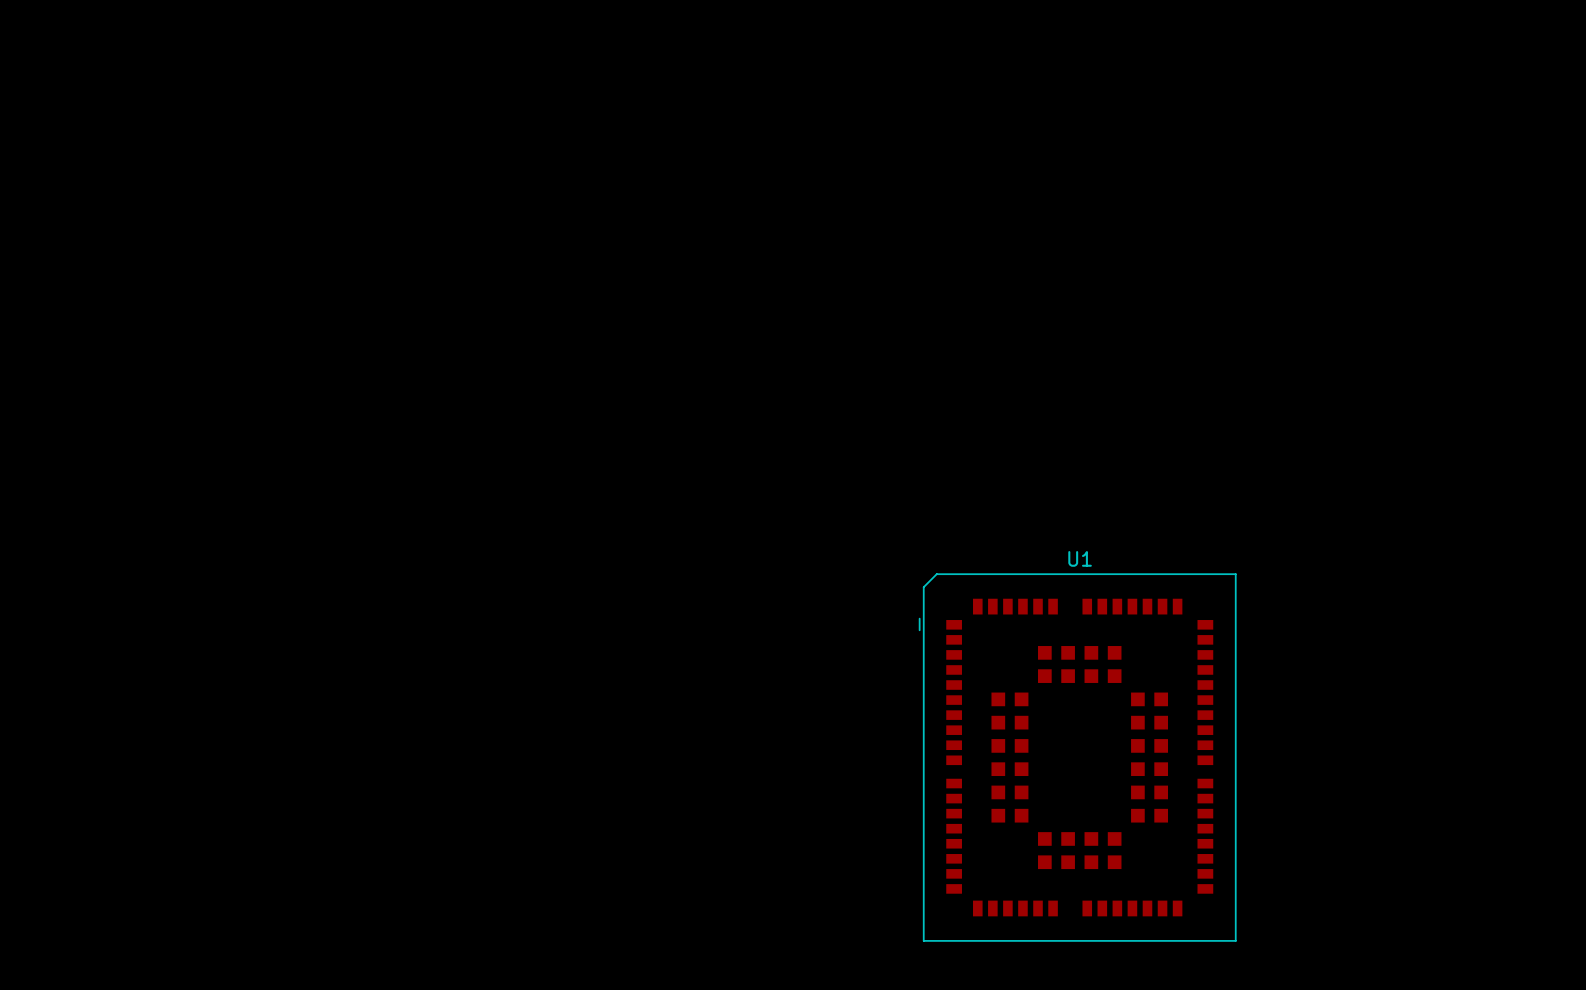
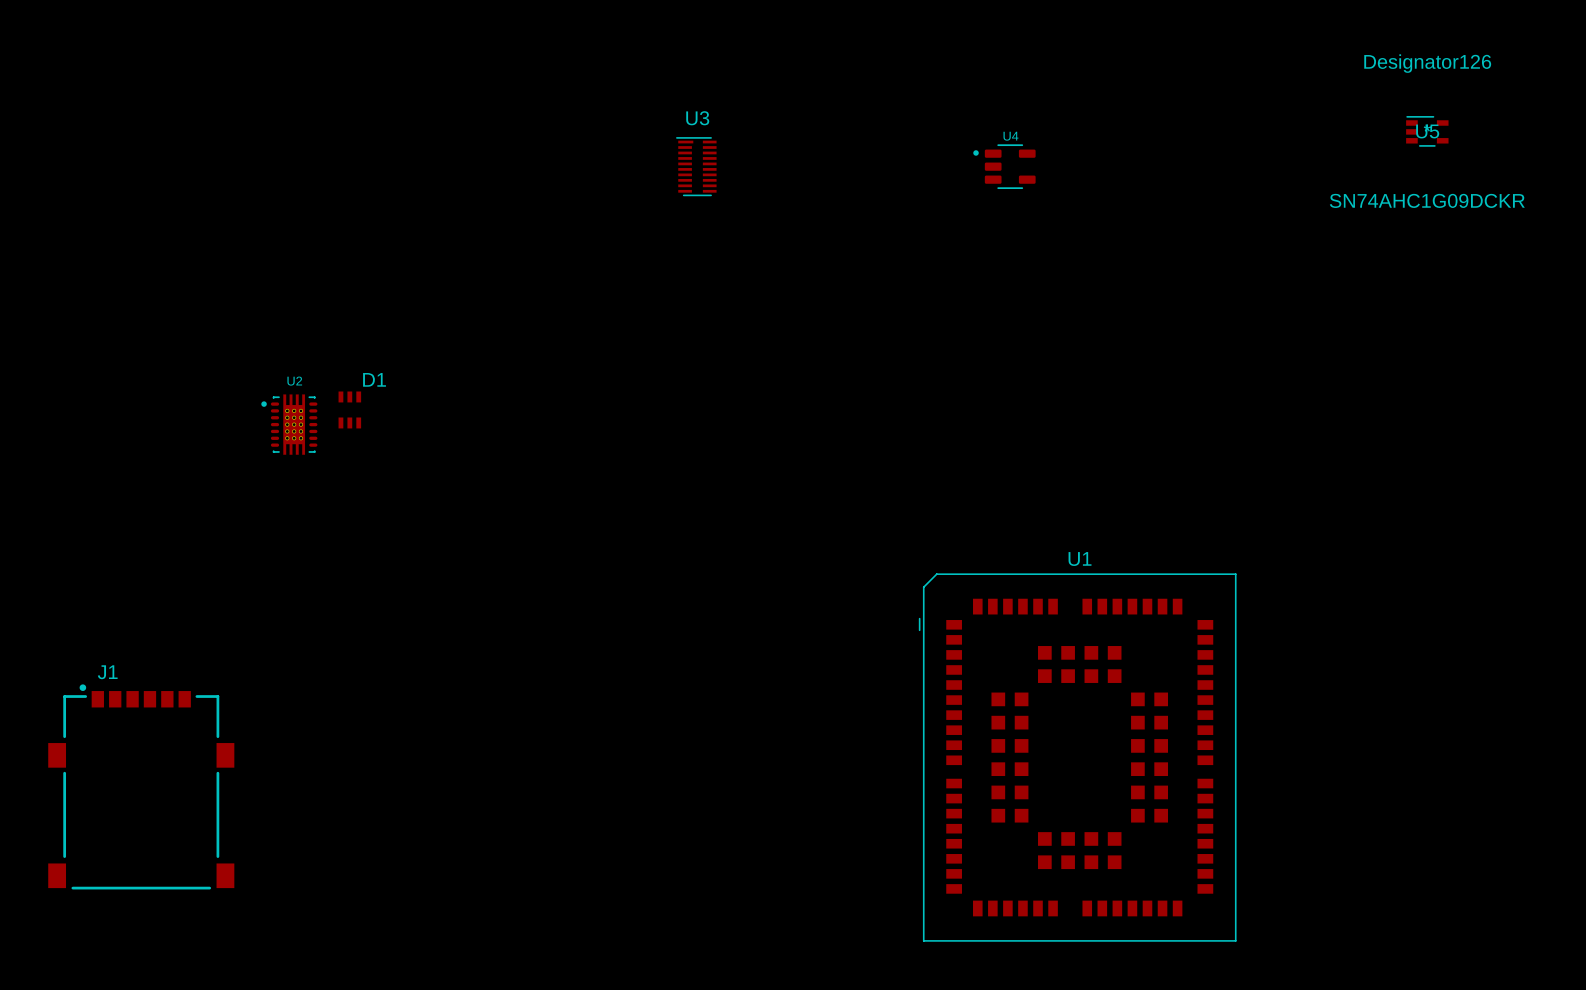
U5: none -> SN74AHC1G09DCKR (1427, 131)
U3: none -> (696, 166)
U4: none -> (1004, 166)
D1: none -> (349, 409)
U2: none -> (289, 424)
J1: none -> (141, 786)

